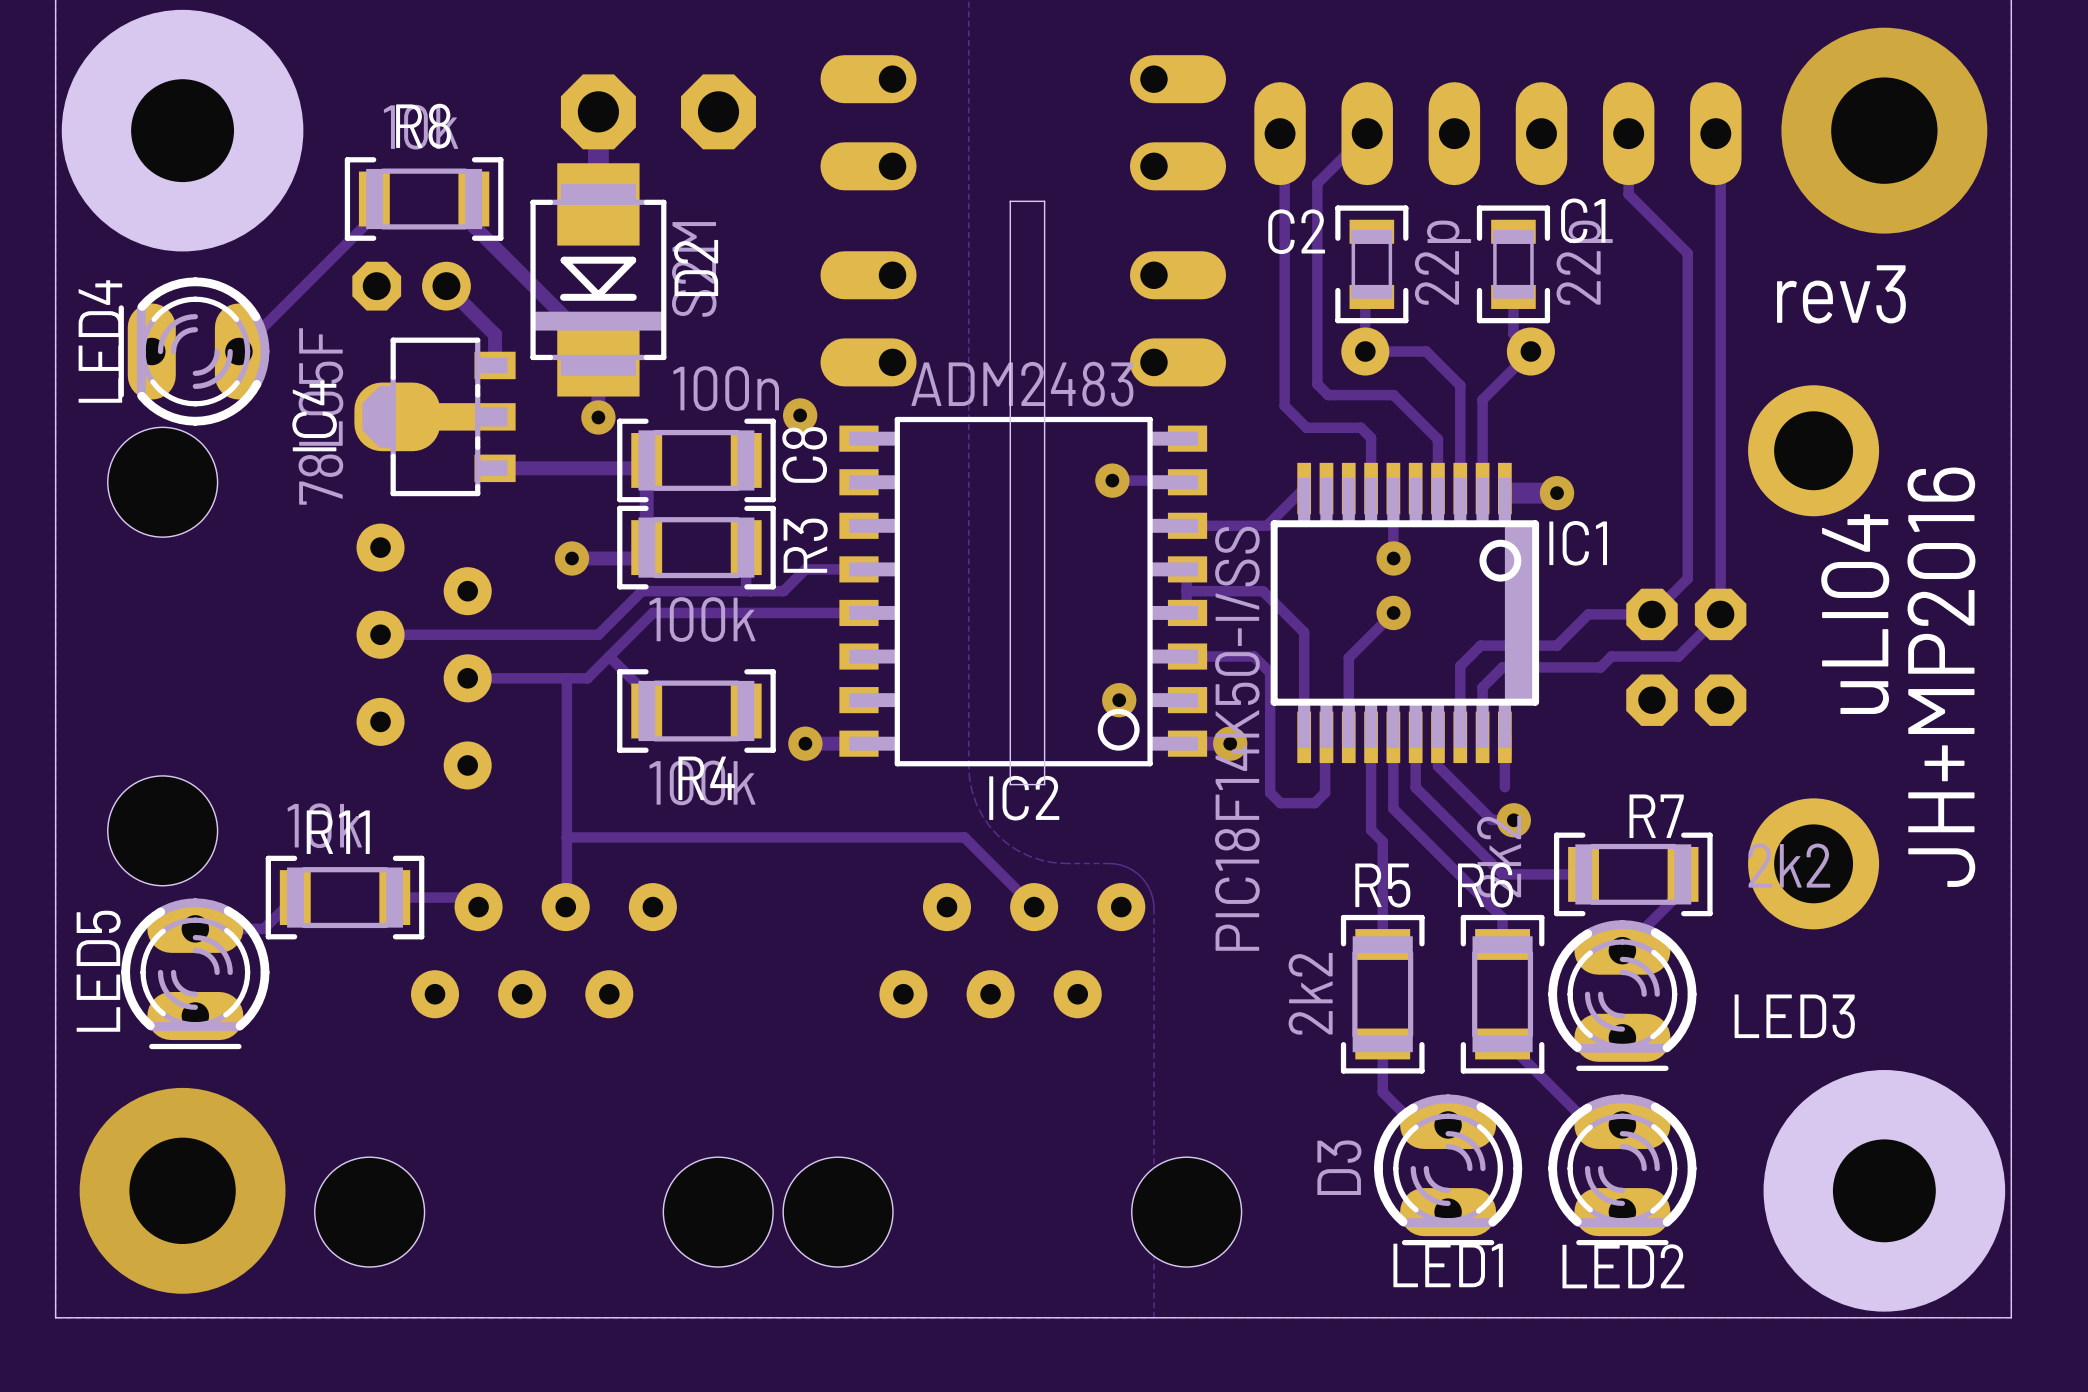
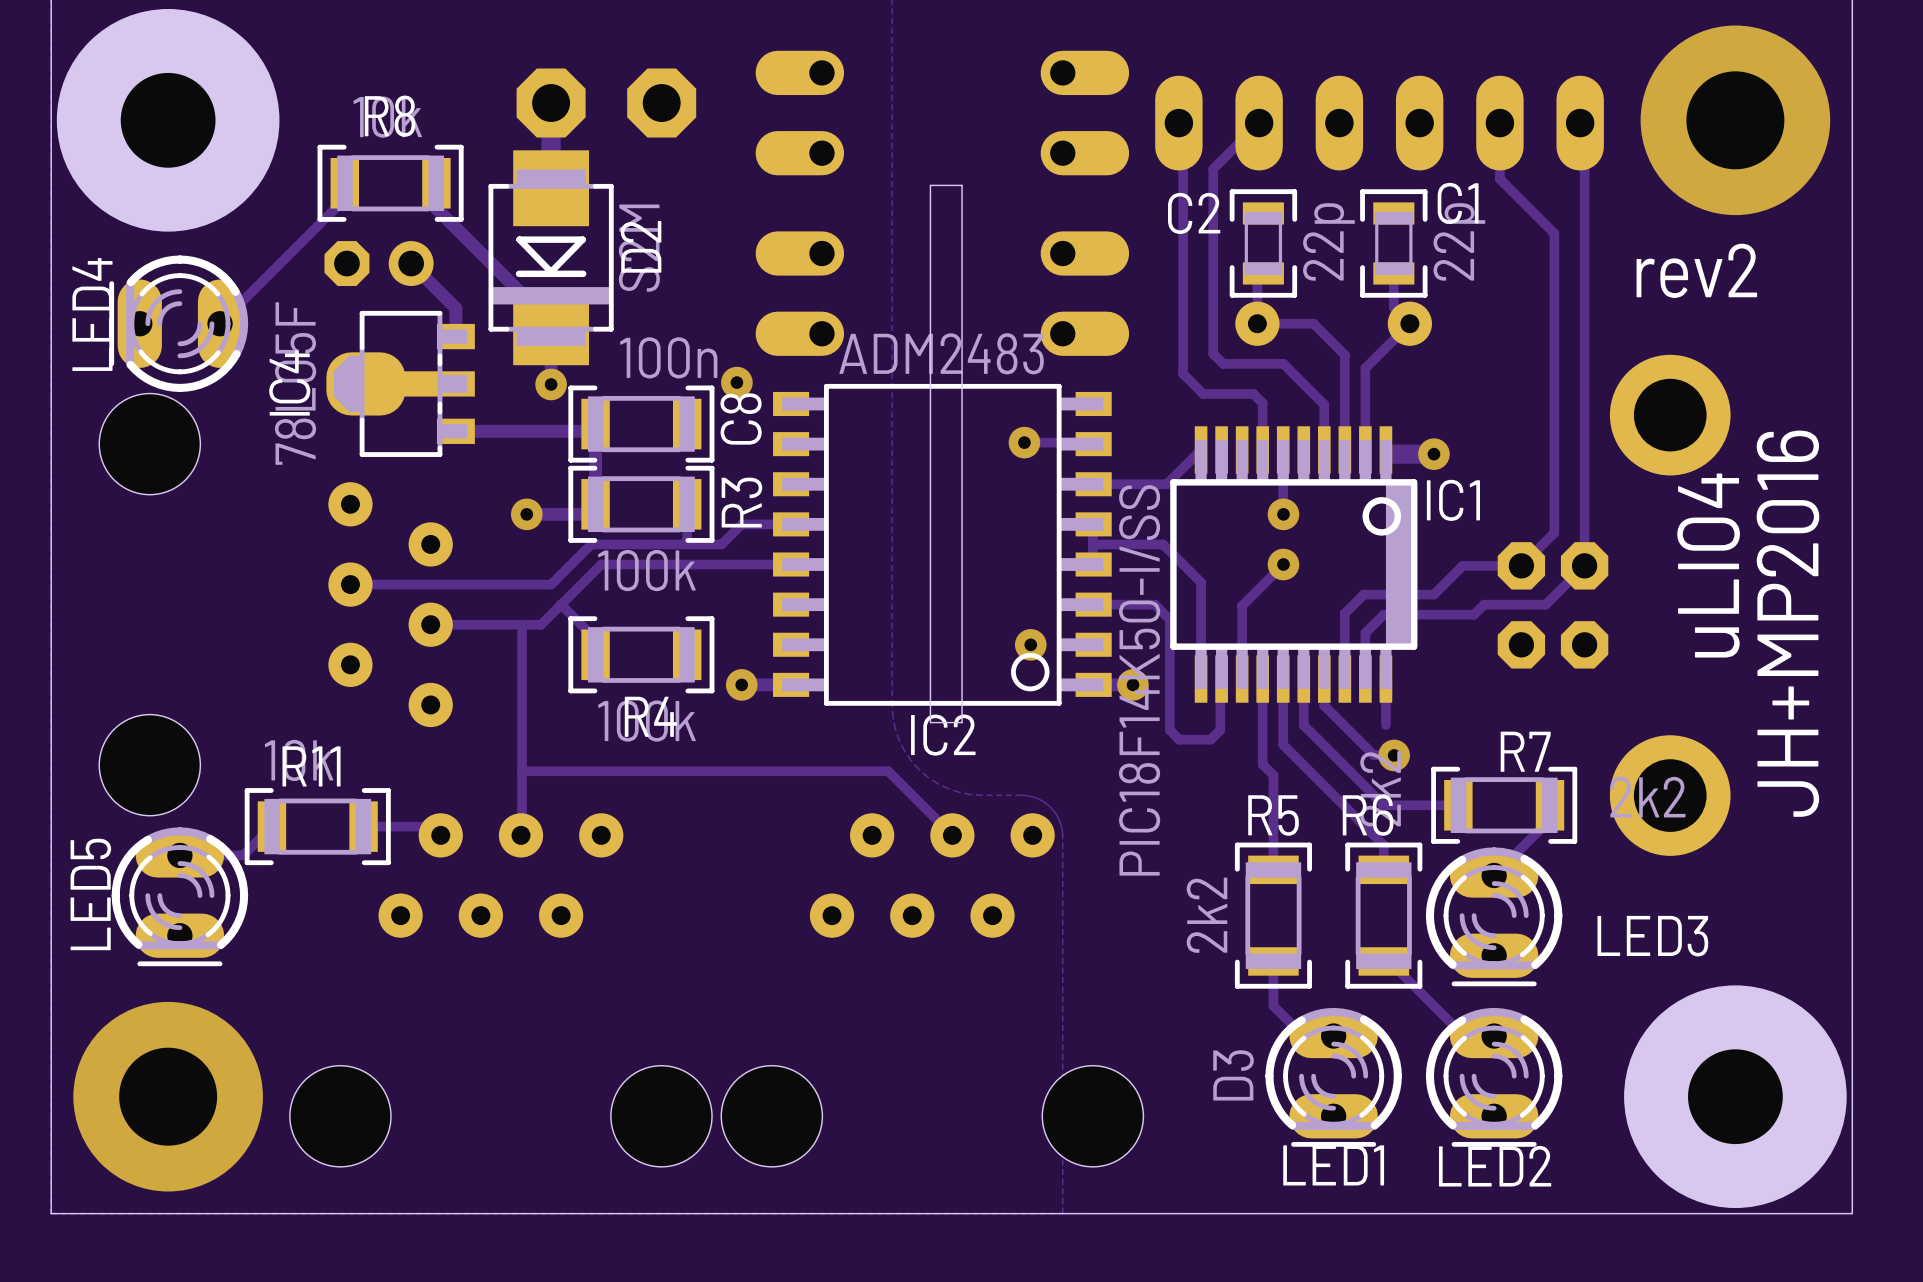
text: rev3 (1841, 294) -> rev2 (1696, 270)

